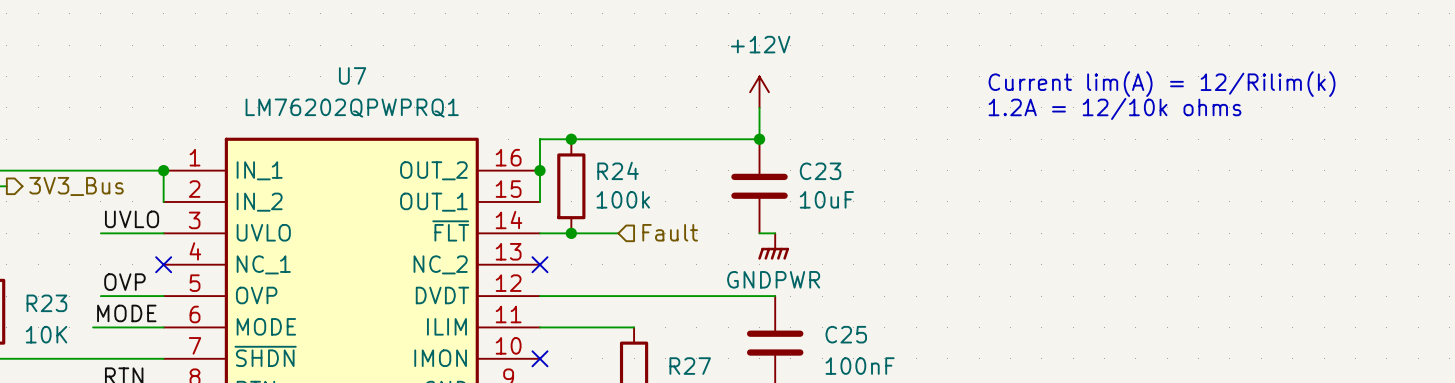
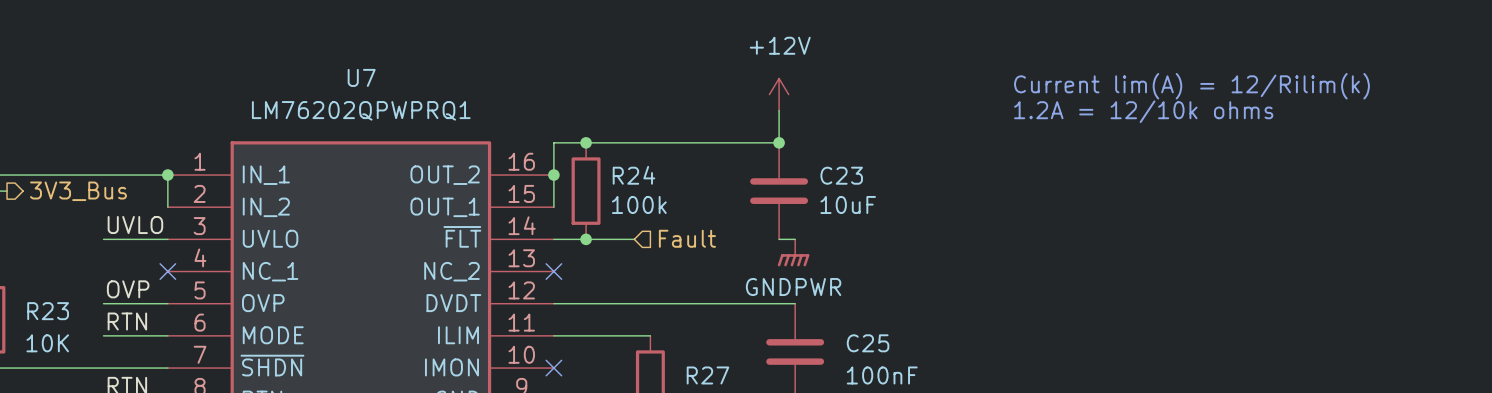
label: MODE (126, 313) -> RTN (127, 321)
wire: (93, 327) (100, 327) -> none

